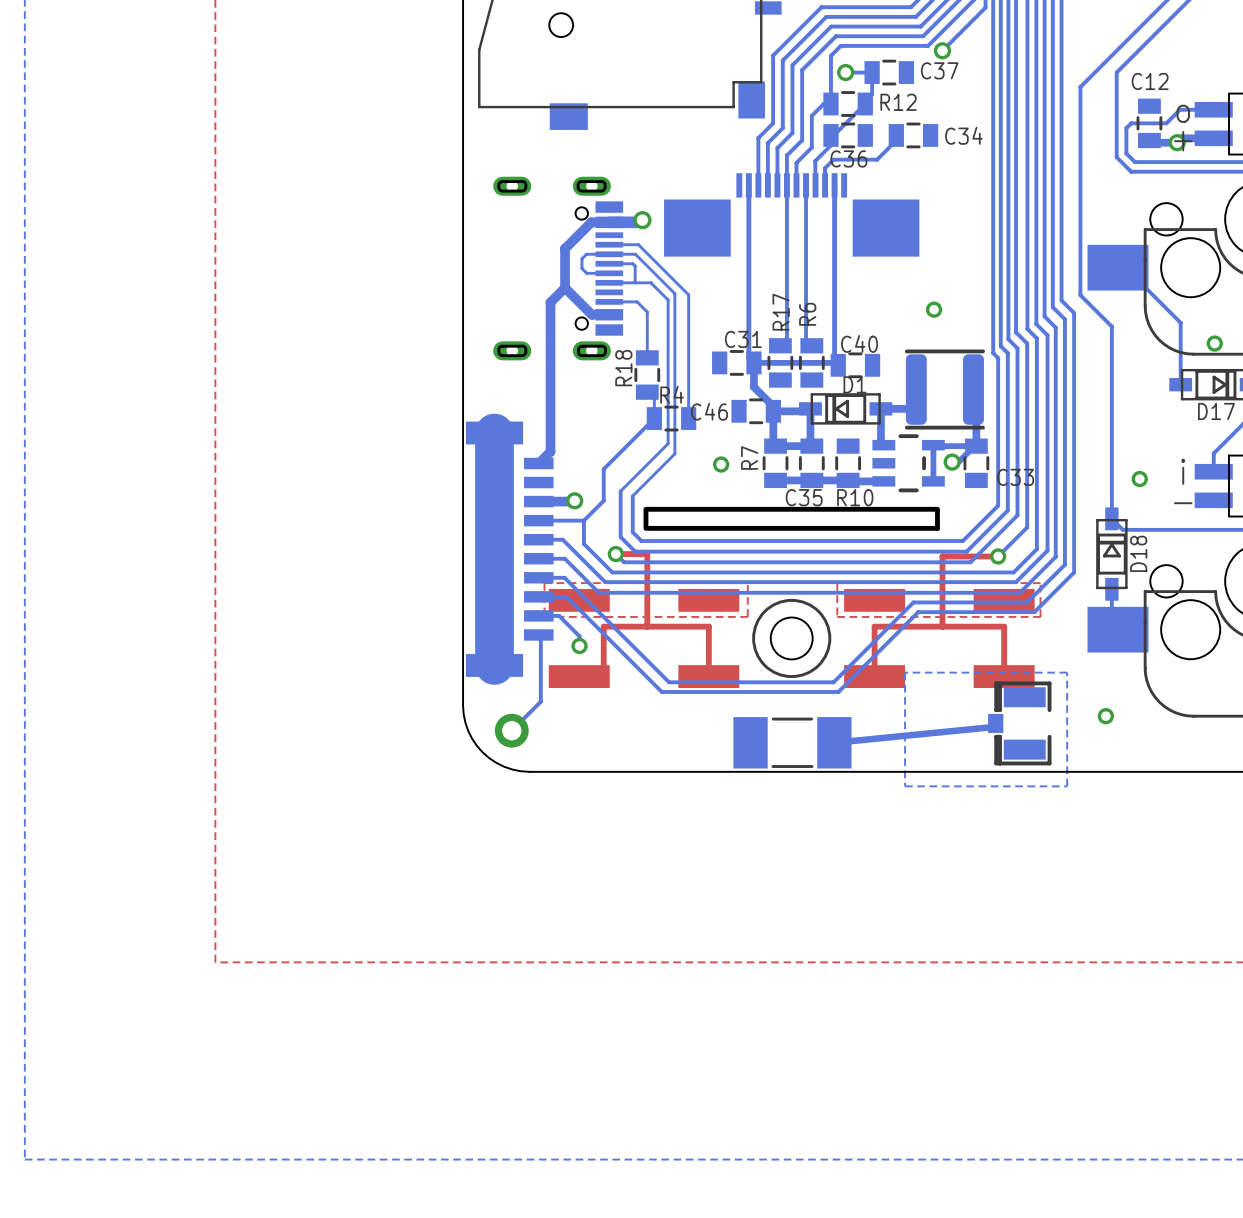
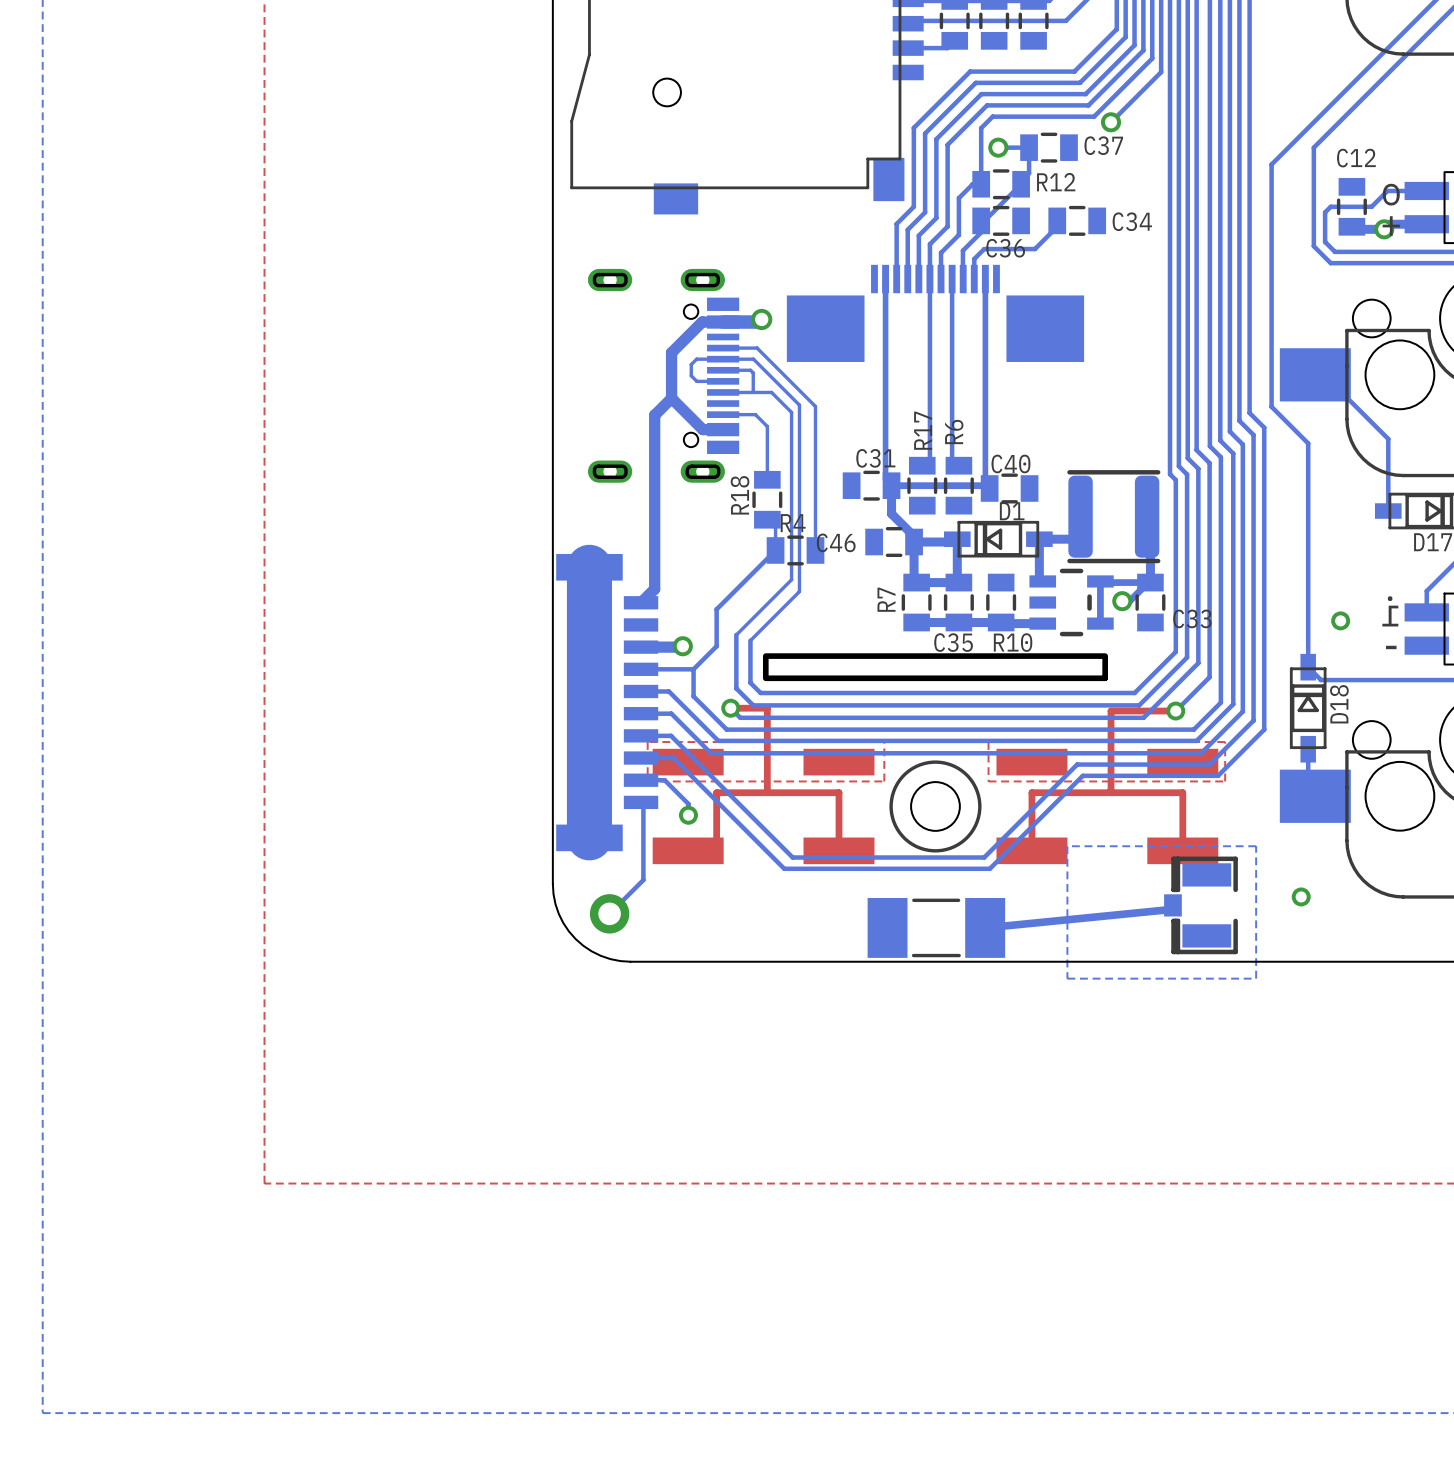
via: (934, 309) -> none
via: (1214, 343) -> none
via: (721, 464) -> none

